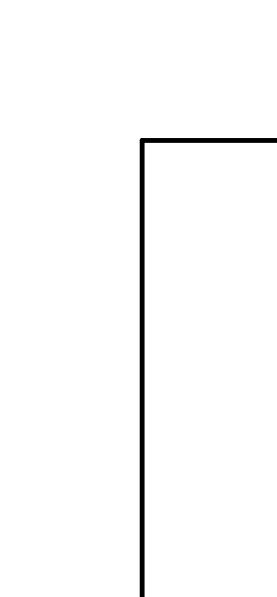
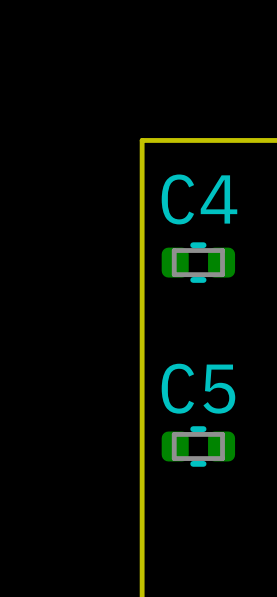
C4: none -> (198, 262)
C5: none -> (198, 446)

